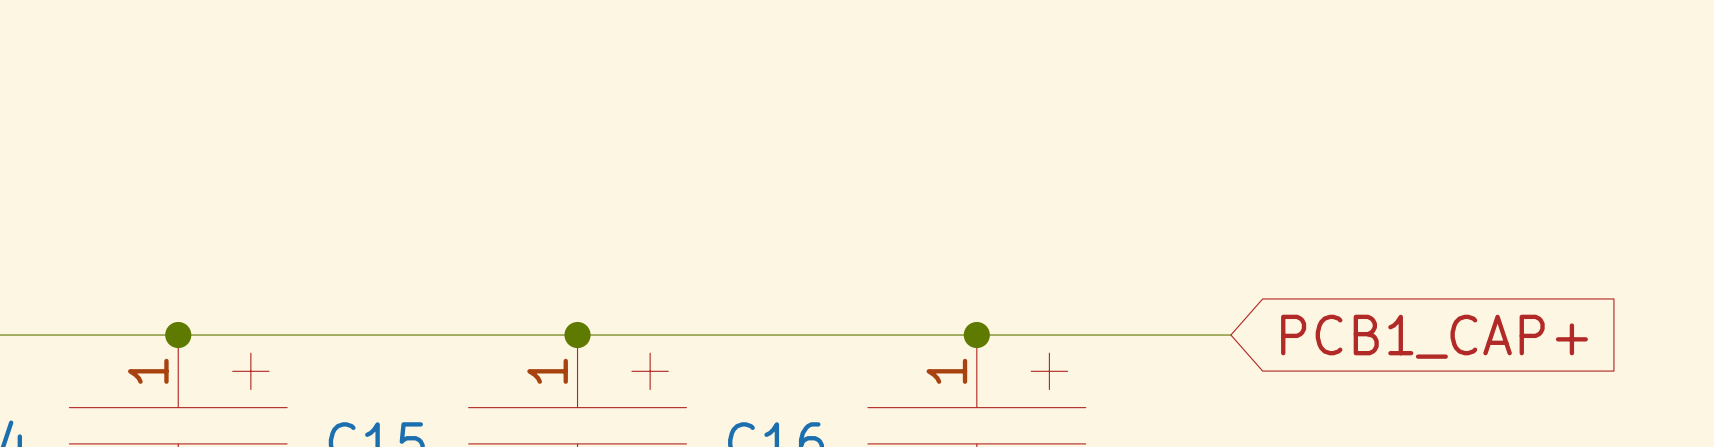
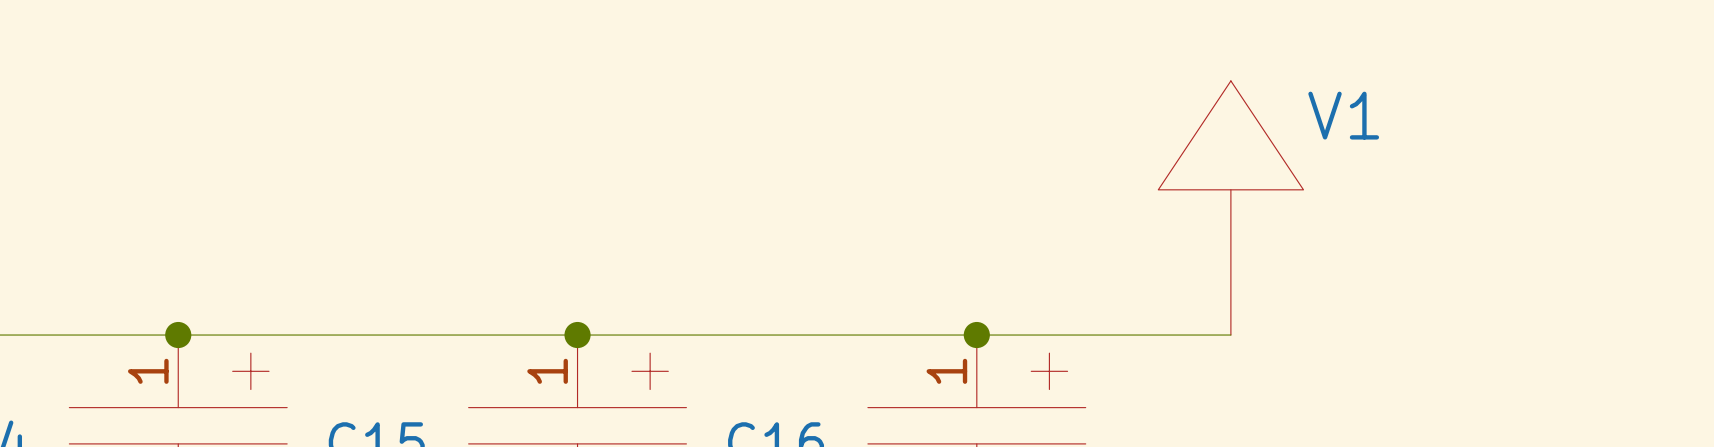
V1: none -> (1230, 207)
global label: PCB1_CAP+ (1434, 336) -> none

